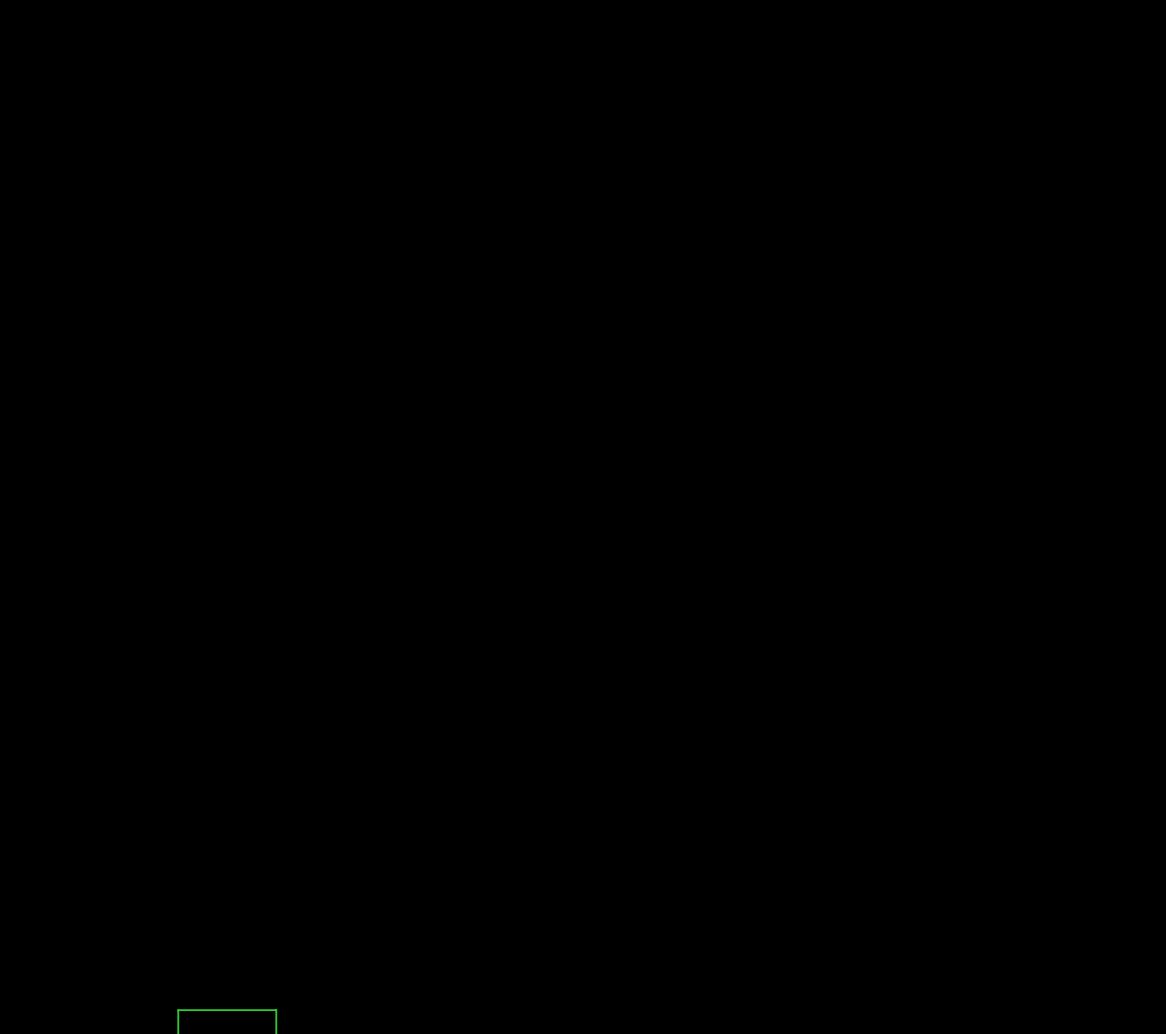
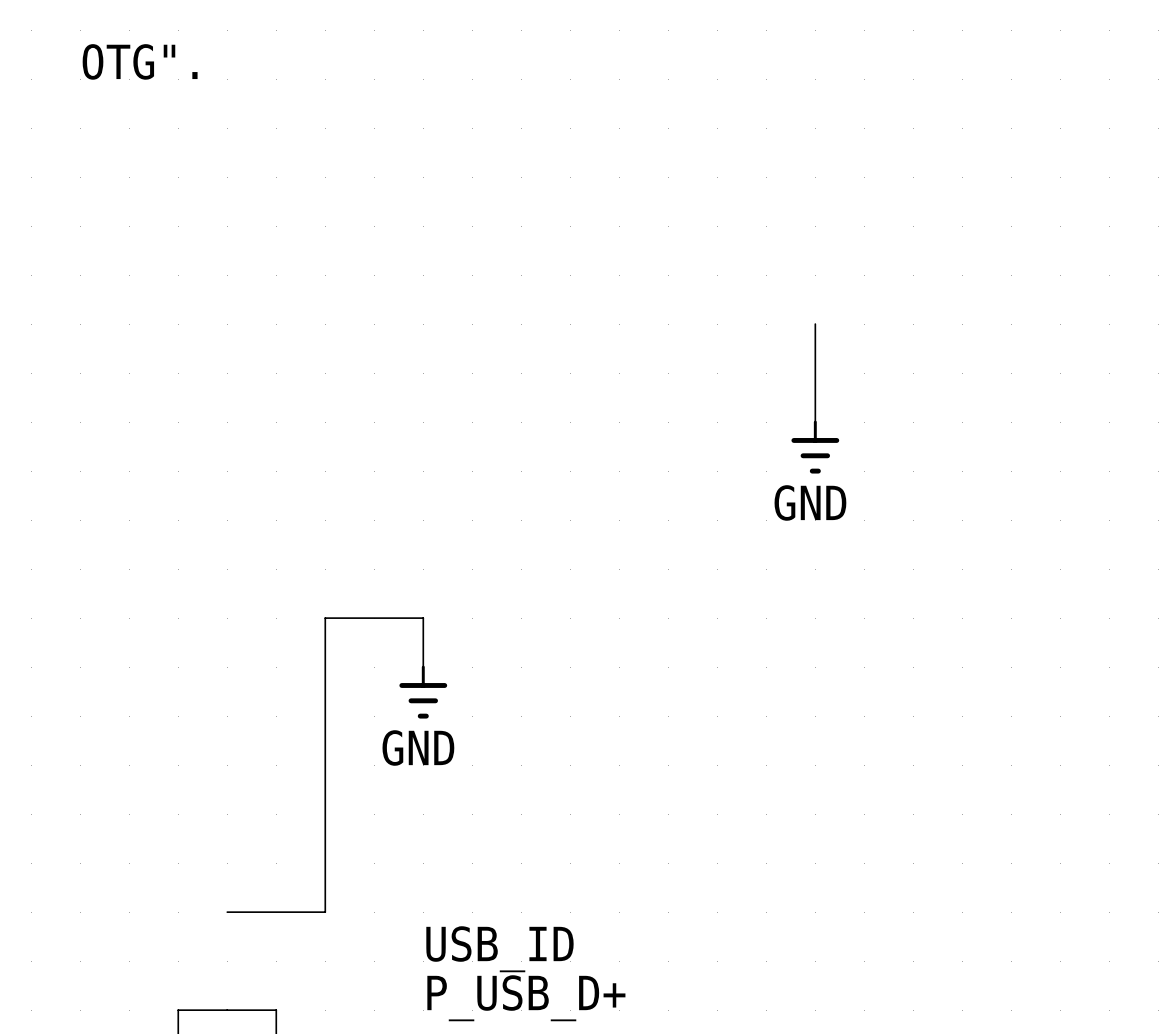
text: none -> OTG". (140, 61)
wire: none -> (815, 324) (815, 422)
power symbol: none -> GND (815, 447)
wire: none -> (423, 667) (423, 618) (325, 618) (325, 912) (227, 912)
power symbol: none -> GND (423, 692)
label: none -> USB_ID (499, 949)
label: none -> P_USB_D+ (526, 998)

